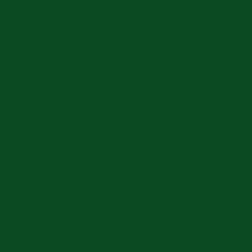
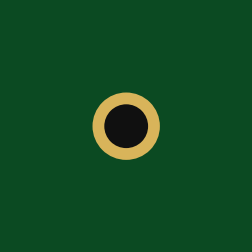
part: none -> (126, 126)

